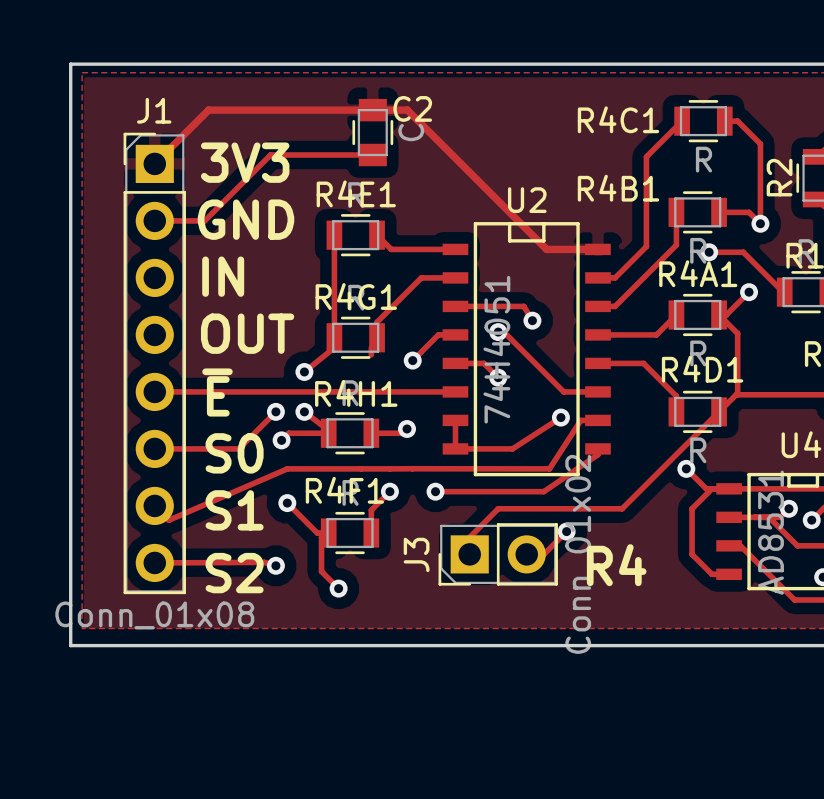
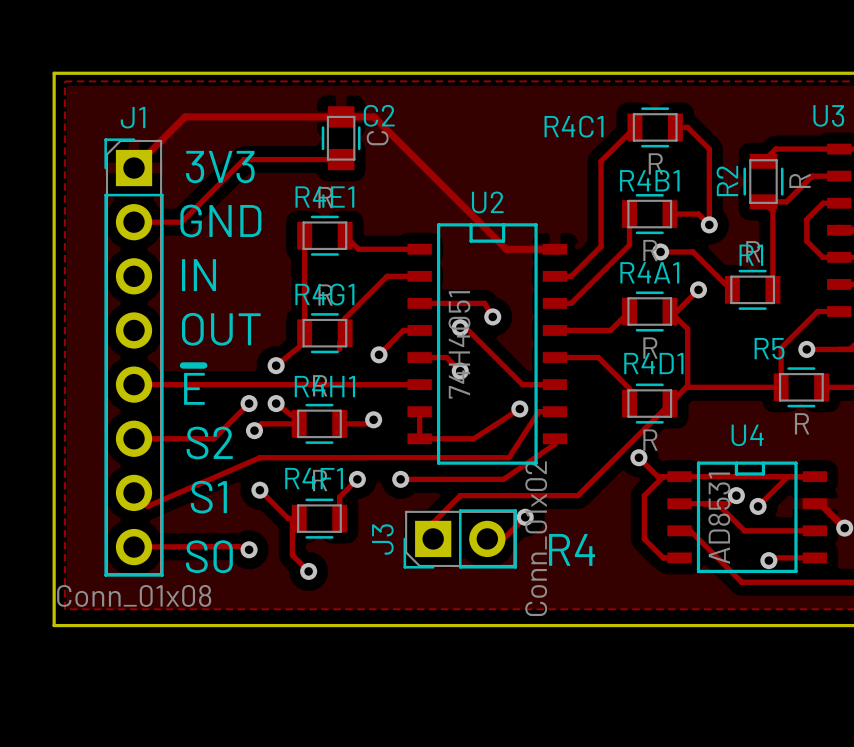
R4B1 name position: R4B1 (618, 188) -> R4B1 (649, 180)
text: S0 (234, 453) -> S2 (209, 442)
text: S2 (234, 573) -> S0 (209, 556)

